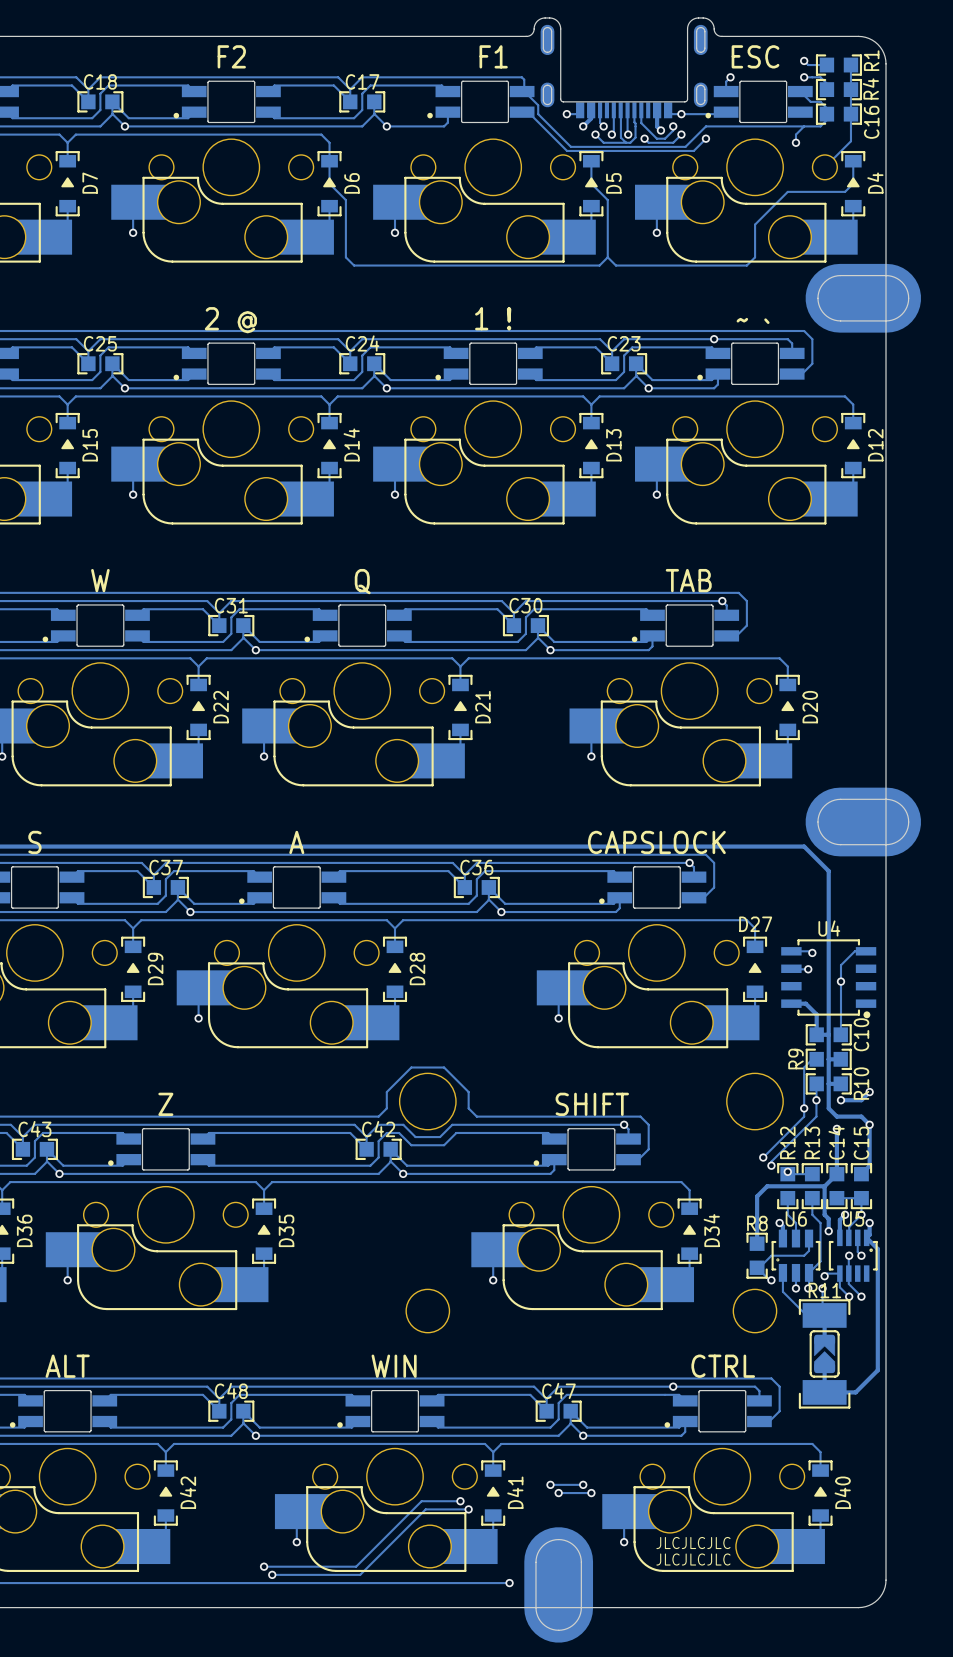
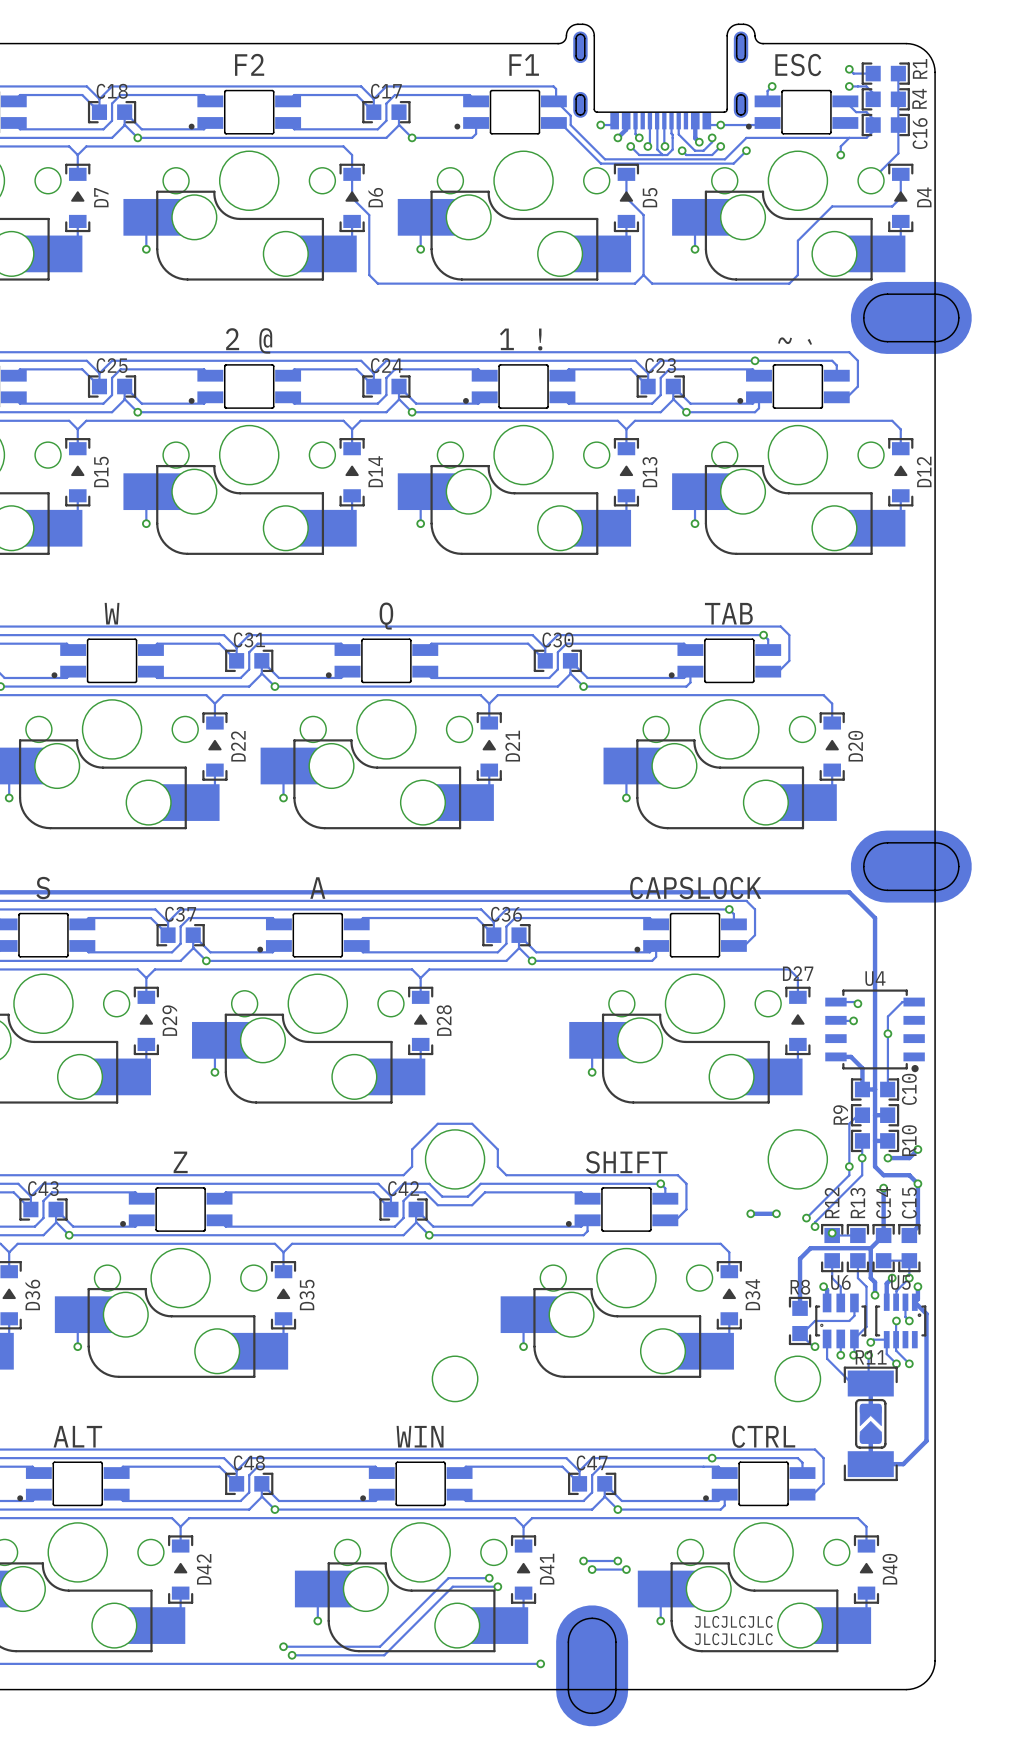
via: none -> (750, 1213)
track: none -> (776, 1213) (750, 1213)
via: none -> (776, 1213)

